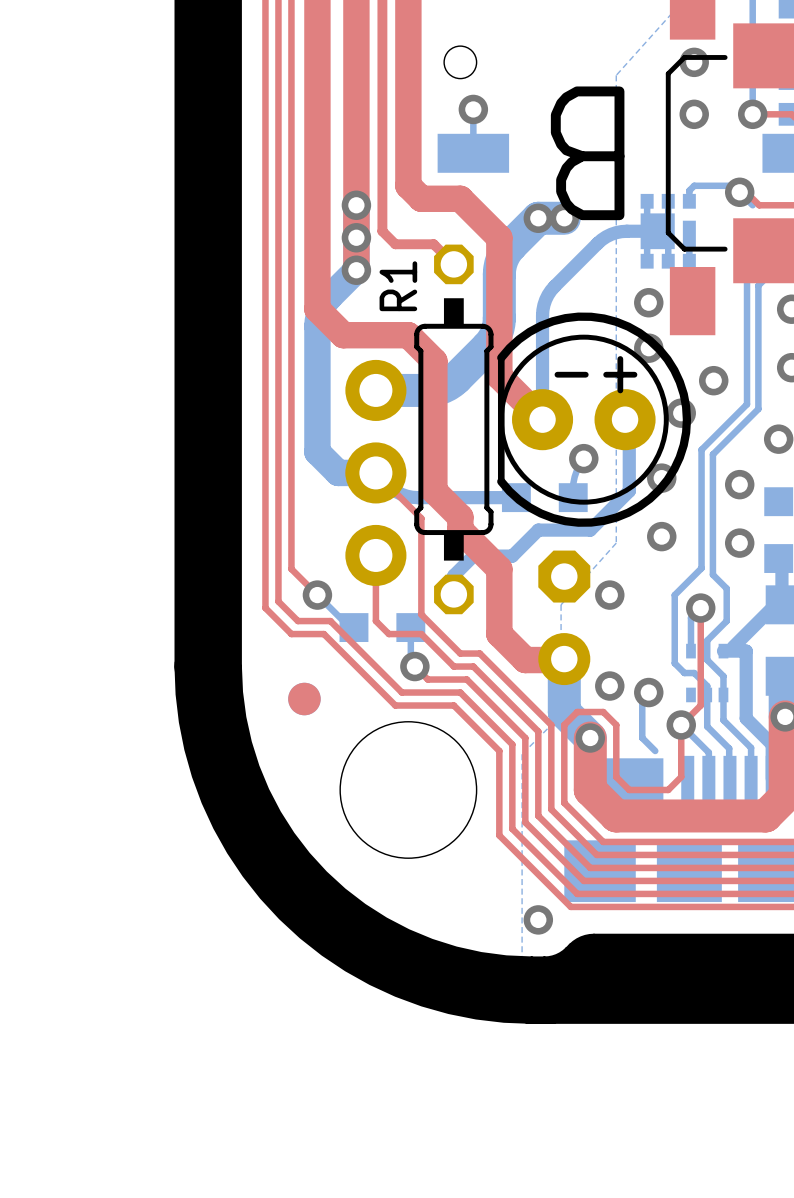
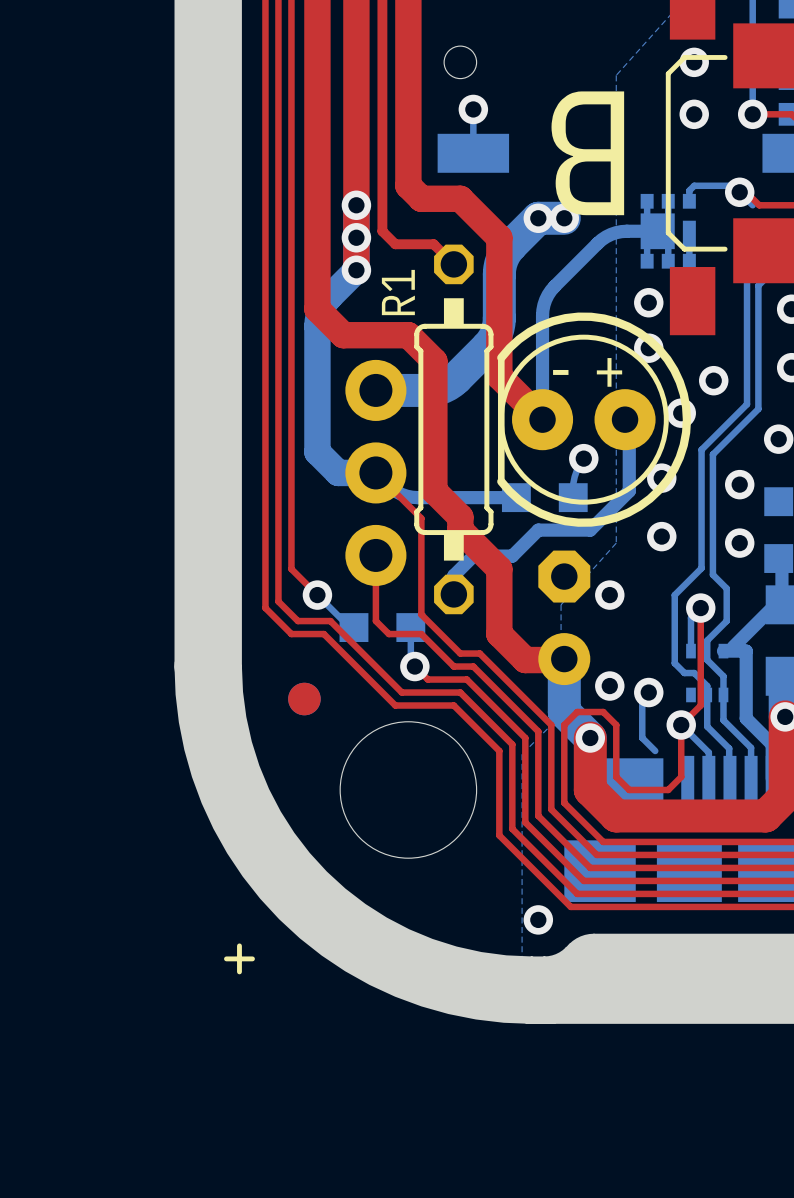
line: none -> (239, 945) (239, 971)
line: none -> (226, 958) (252, 958)

